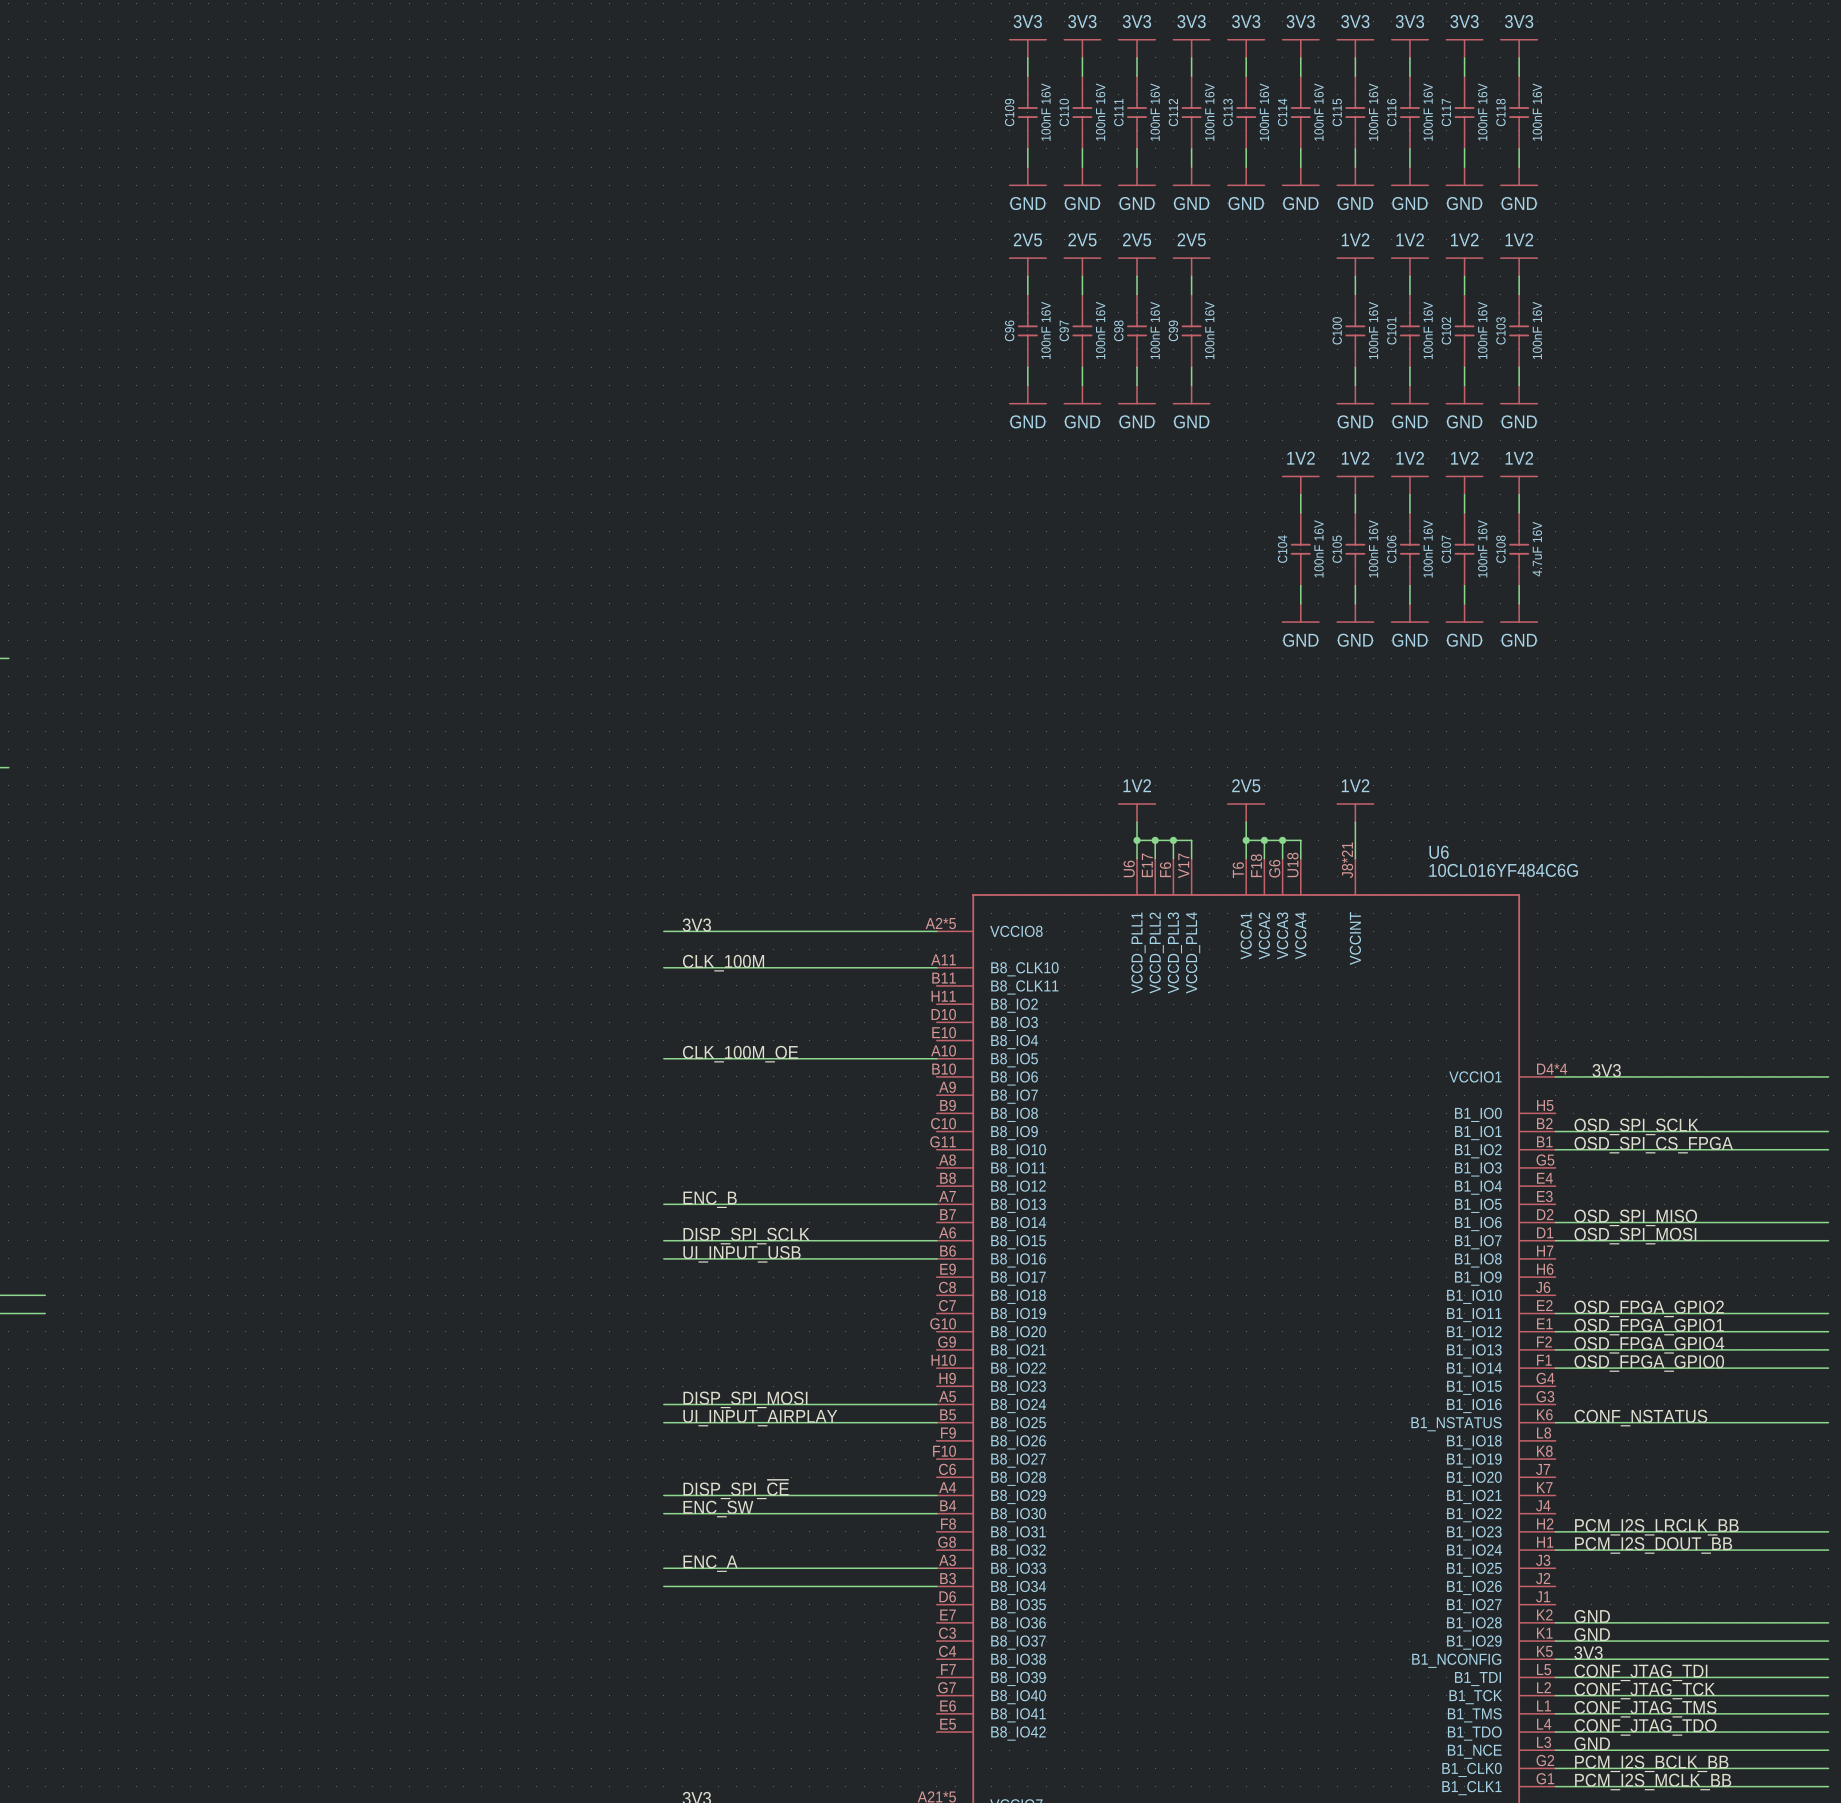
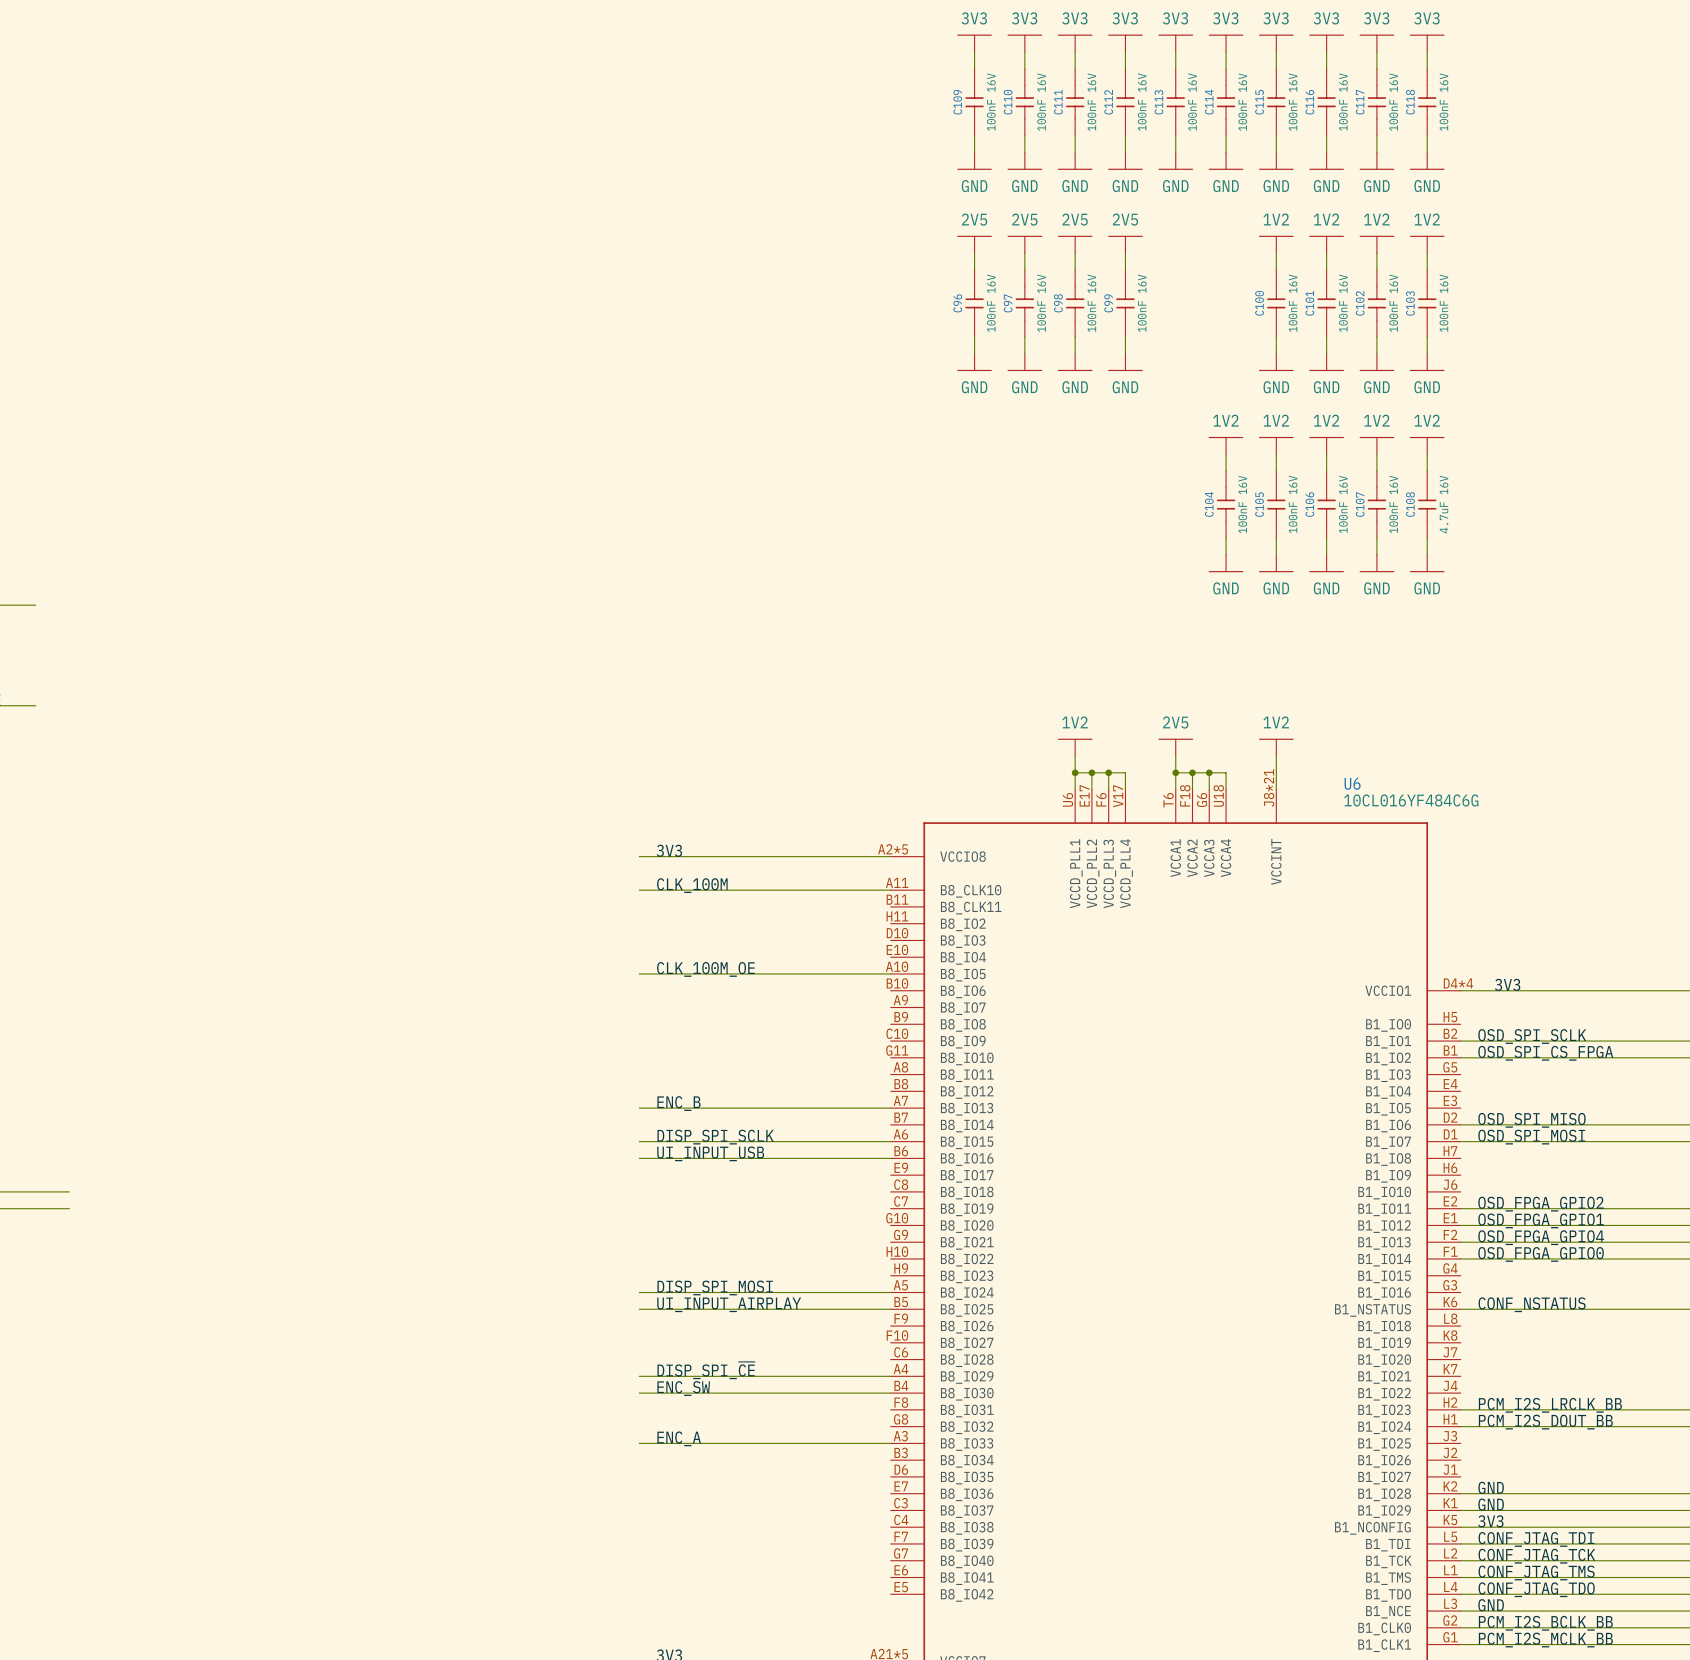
wire: (663, 1586) (936, 1586) -> none

